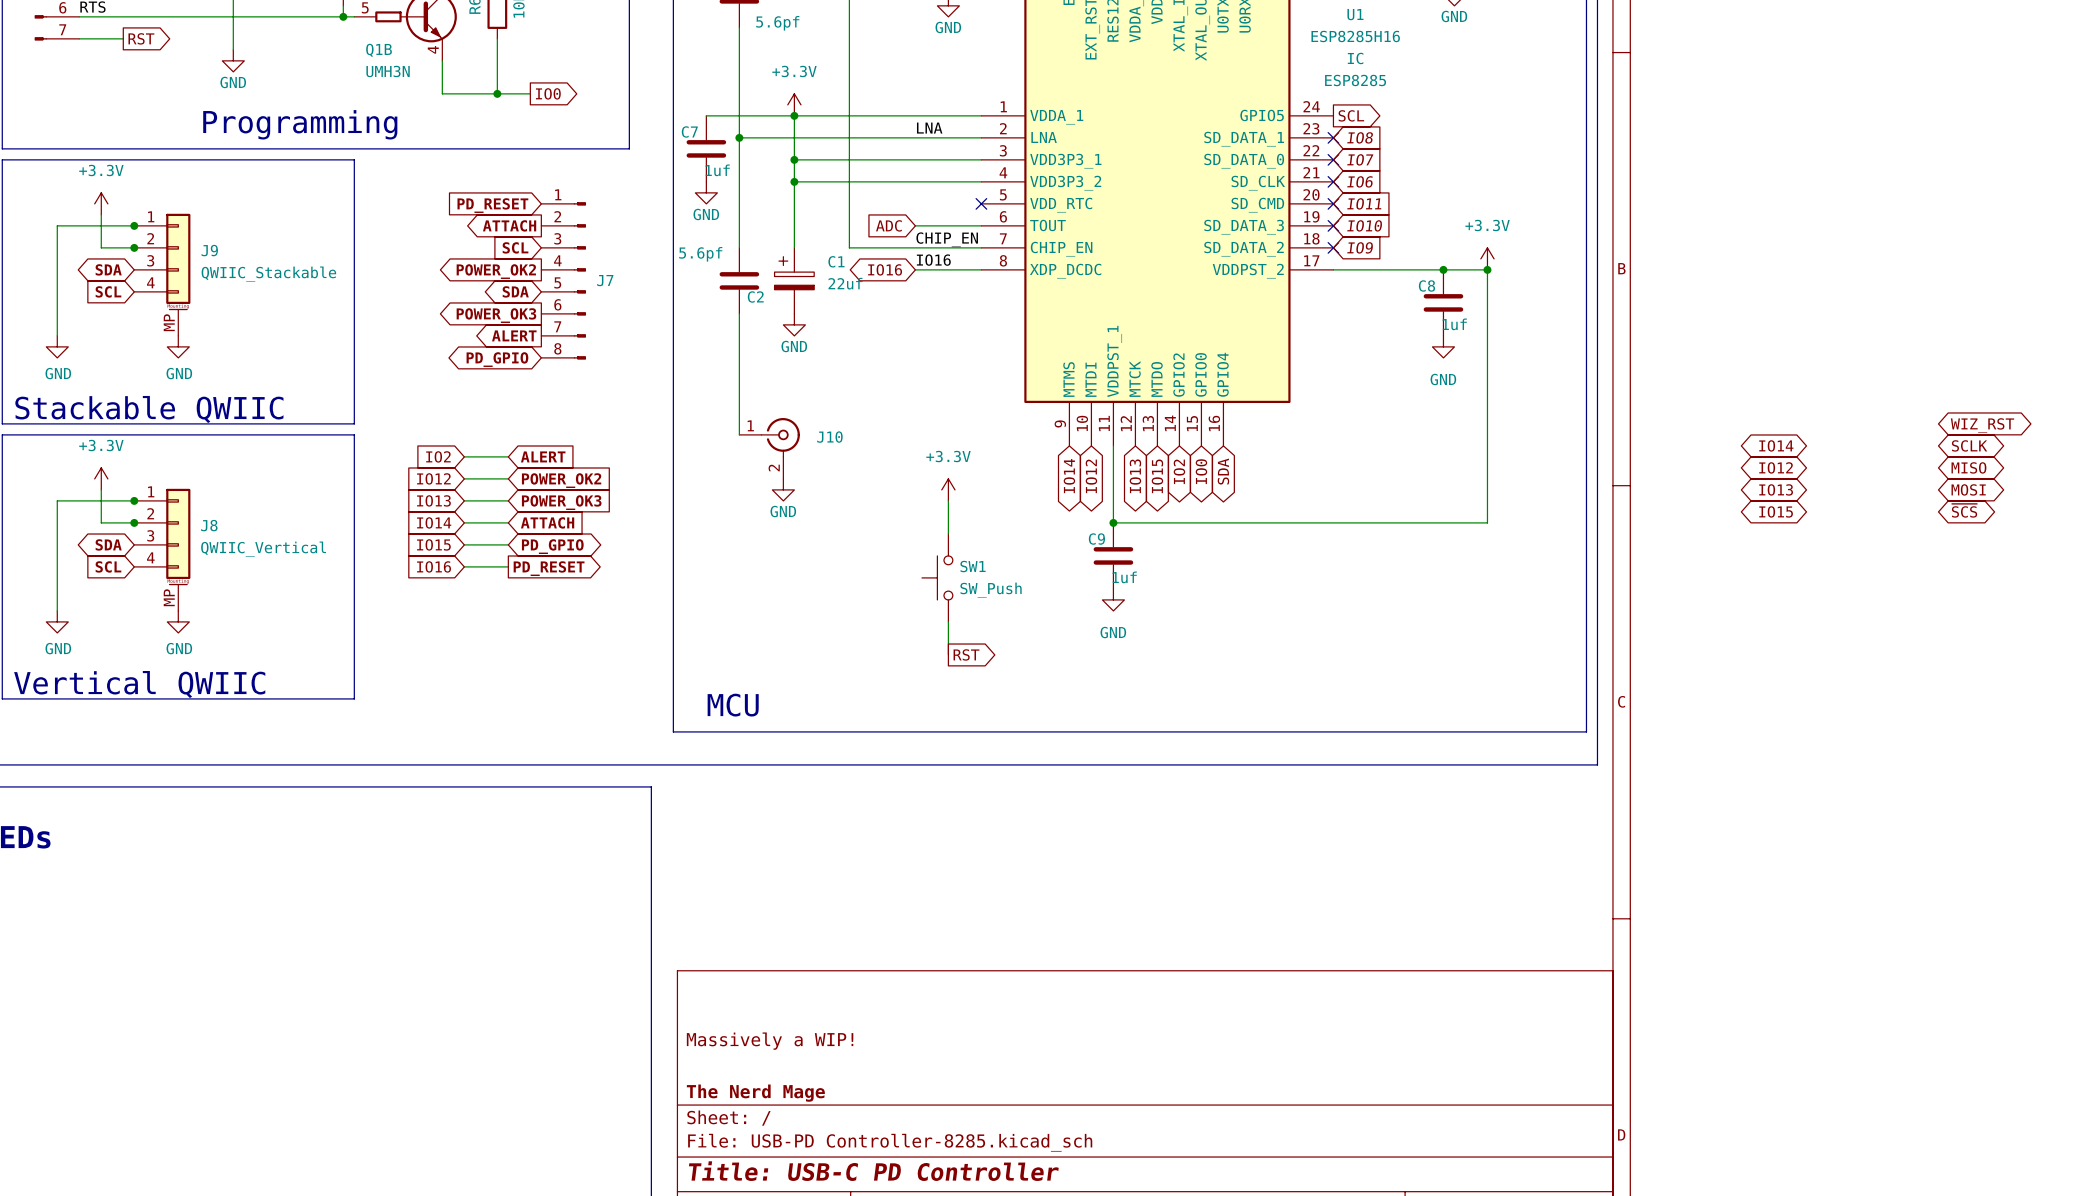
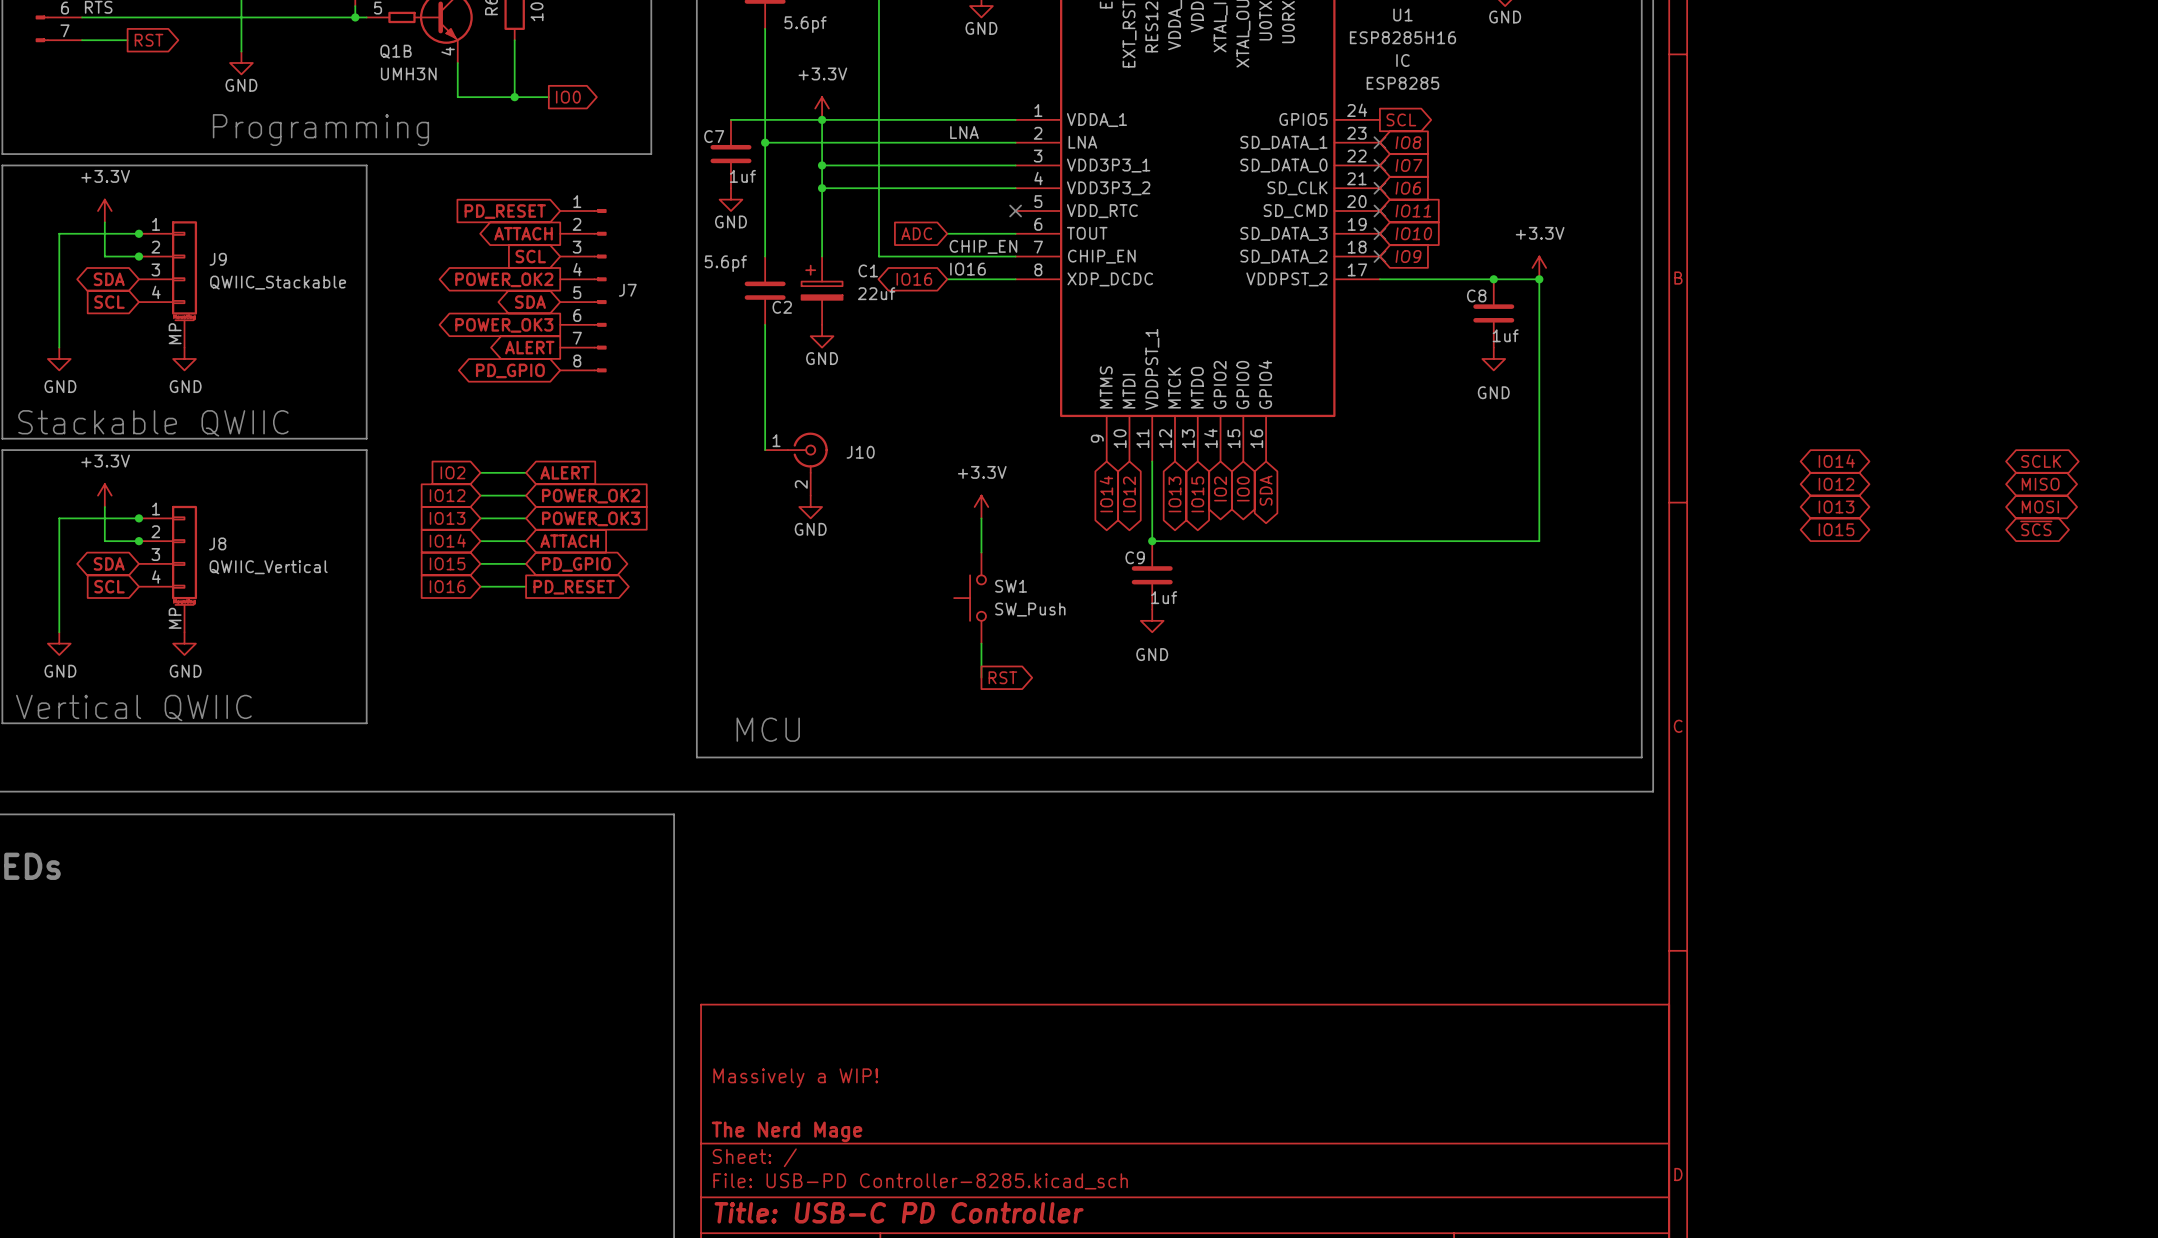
global label: WIZ_RST (1982, 425) -> none

